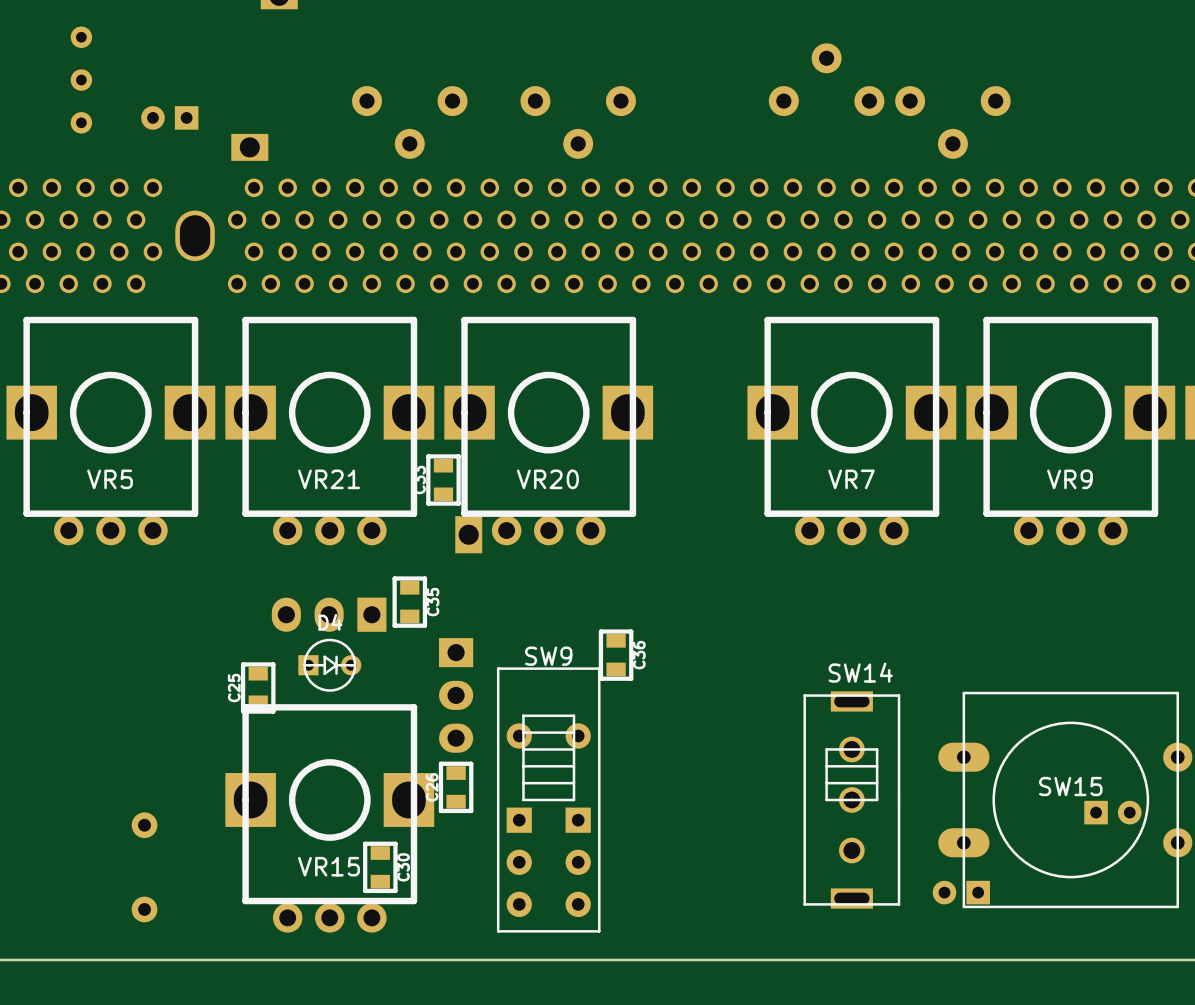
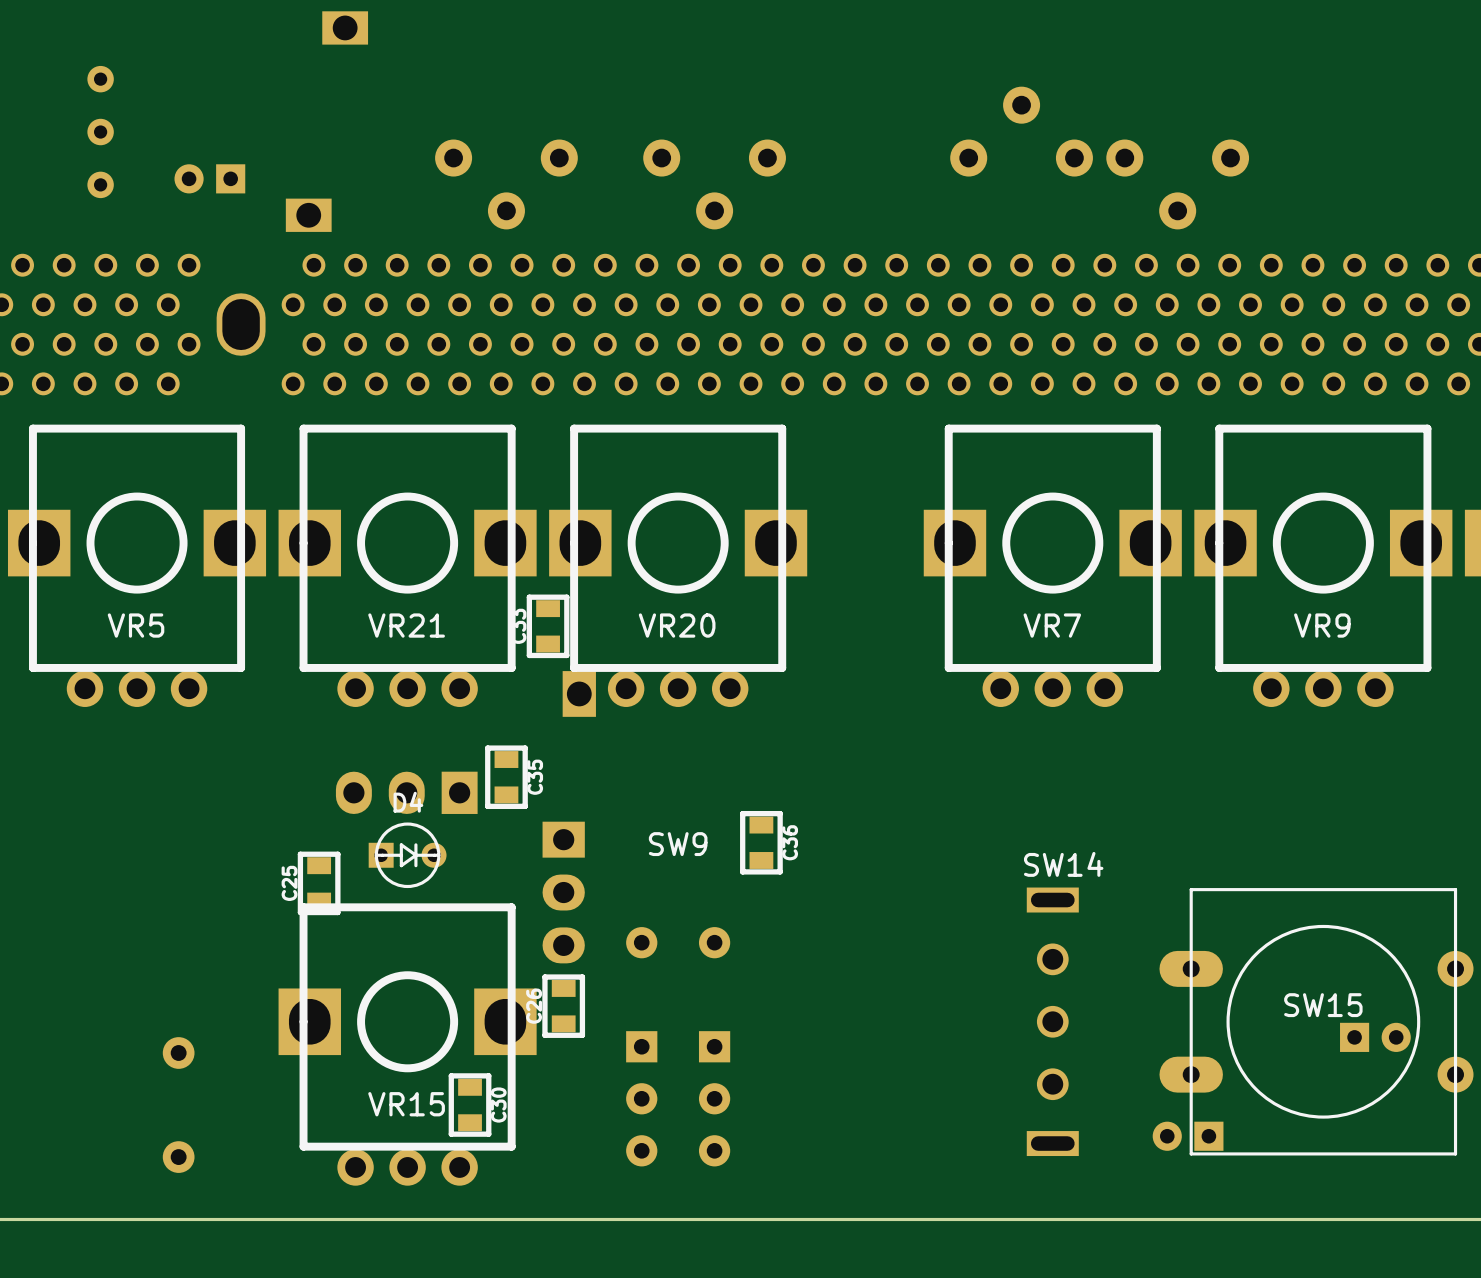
SW9 footprint: [496, 667, 601, 933] -> [626, 927, 731, 1167]
SW14 footprint: [803, 691, 901, 909] -> [1026, 887, 1079, 1157]

